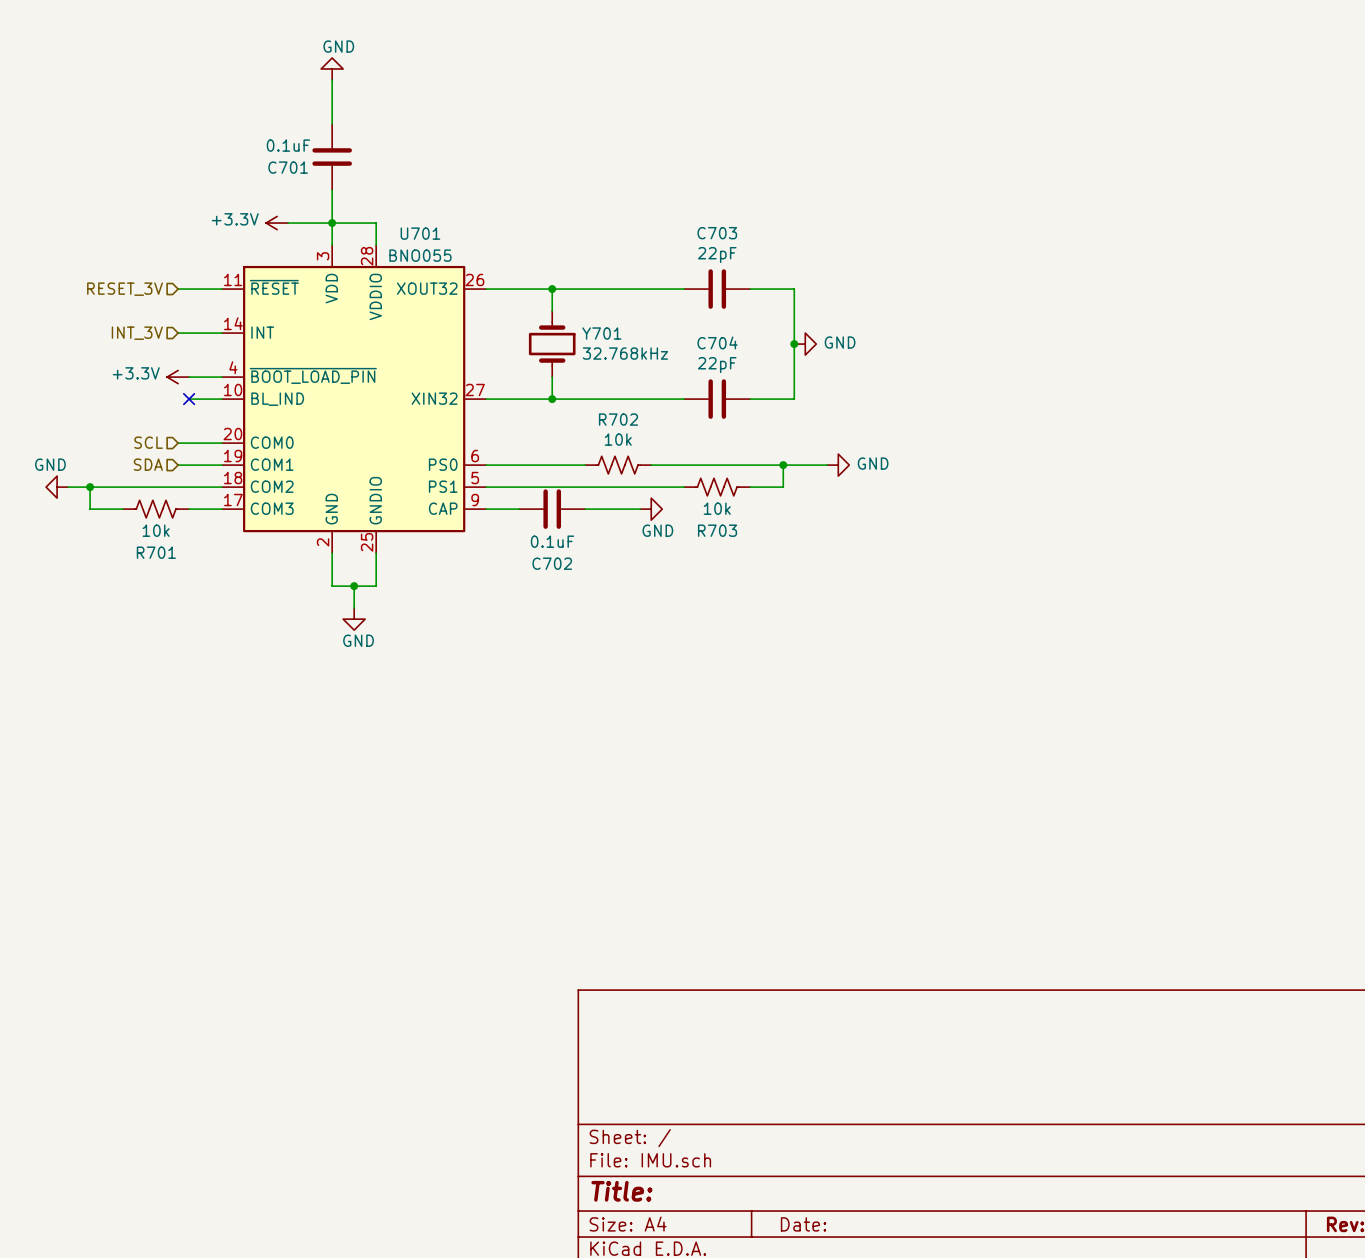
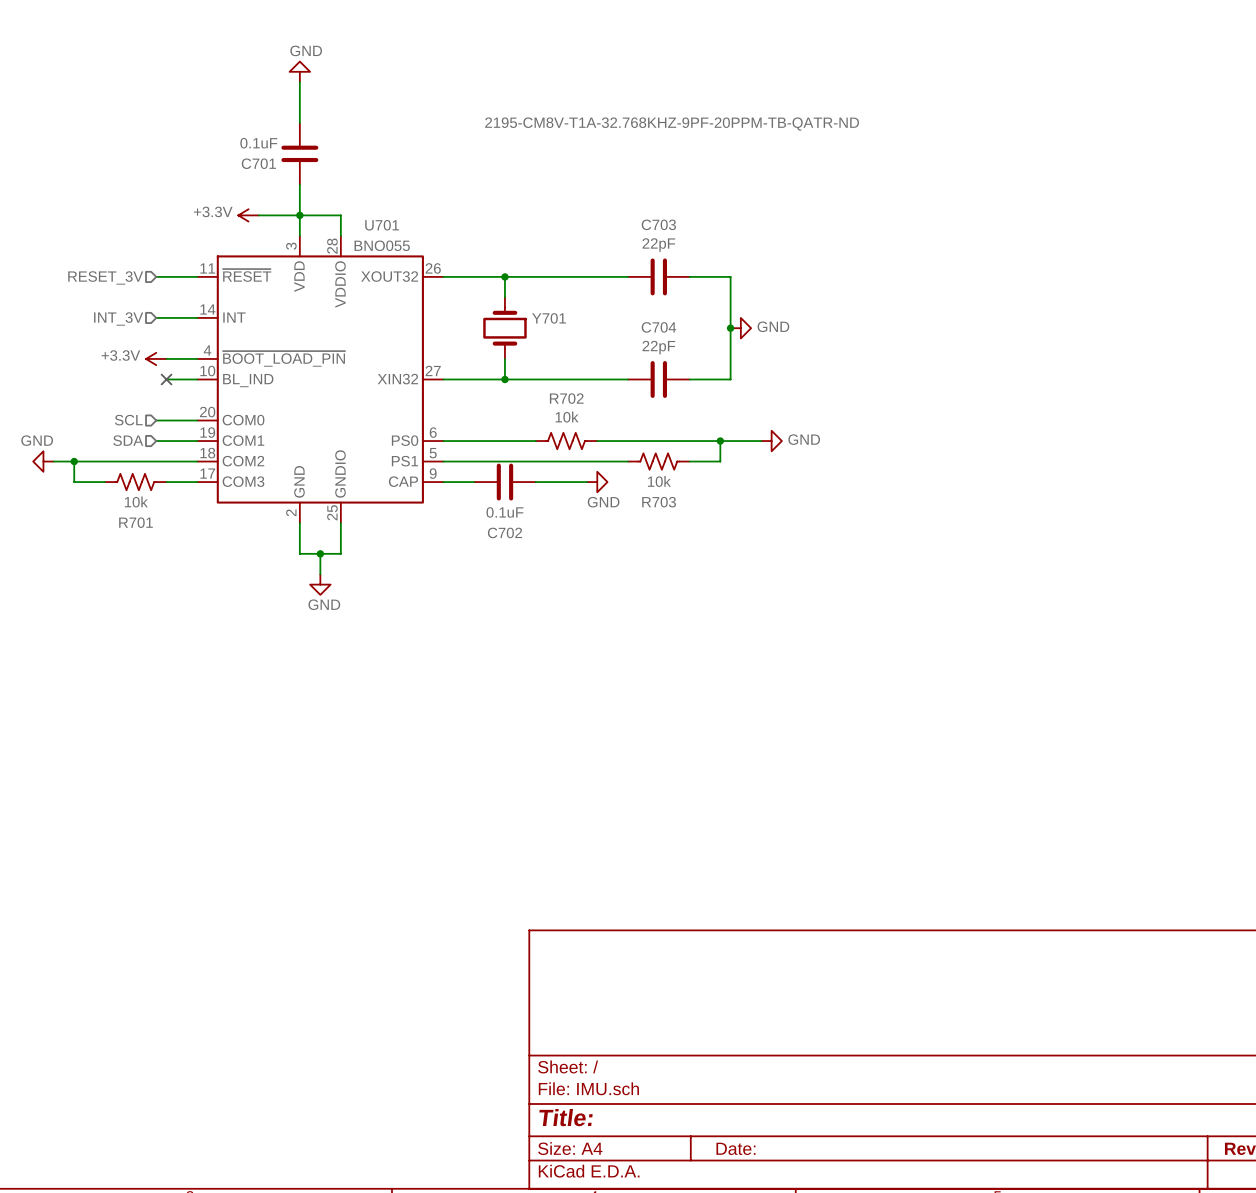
Y701 value: 32.768kHz (625, 353) -> 2195-CM8V-T1A-32.768KHZ-9PF-20PPM-TB-QATR-ND (672, 124)

